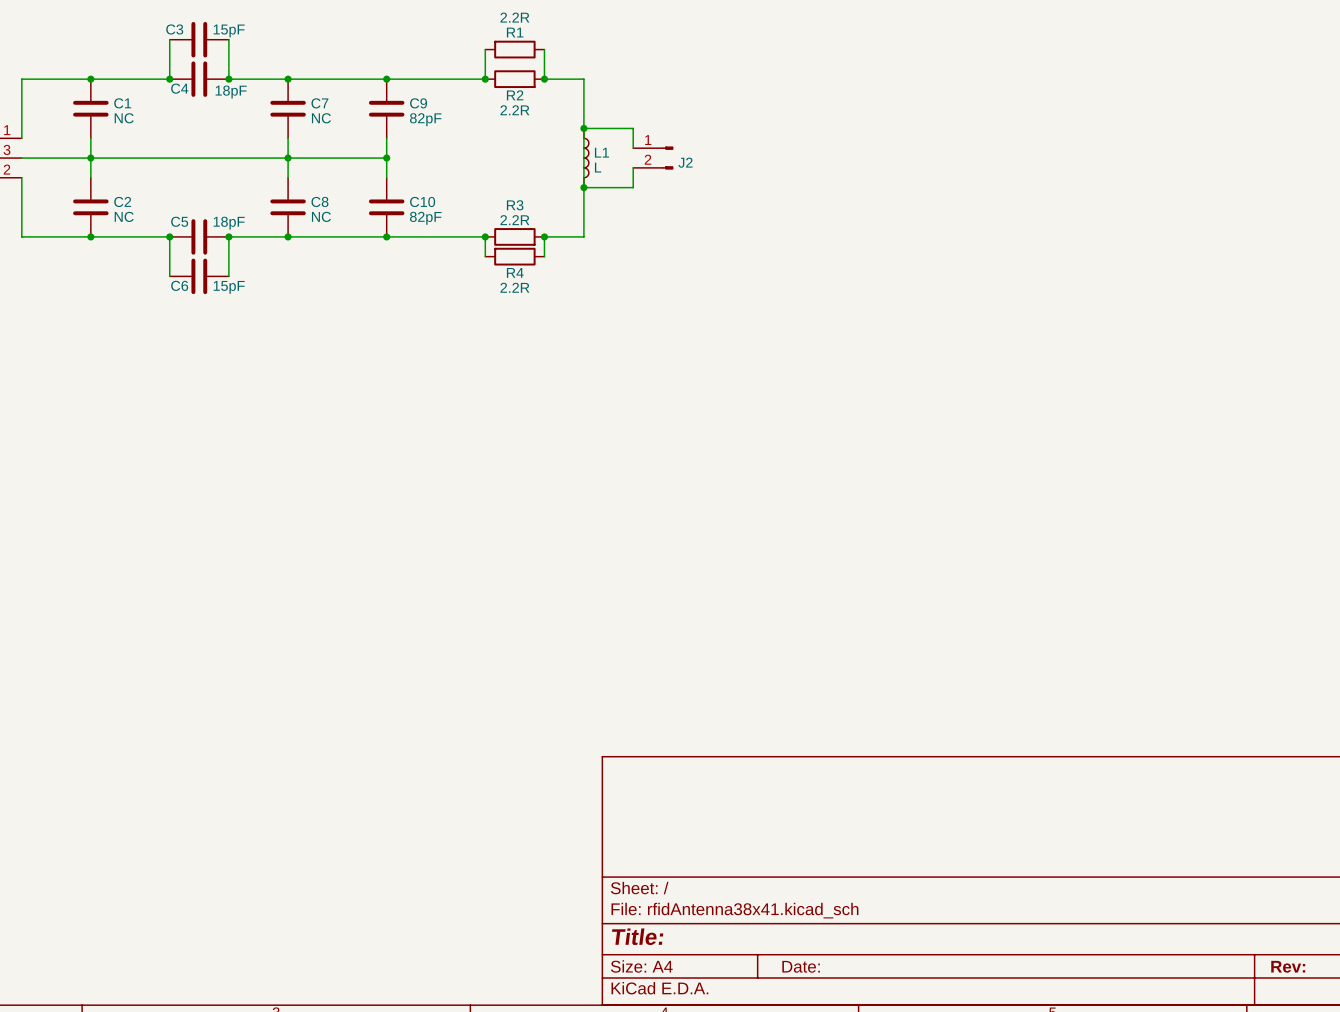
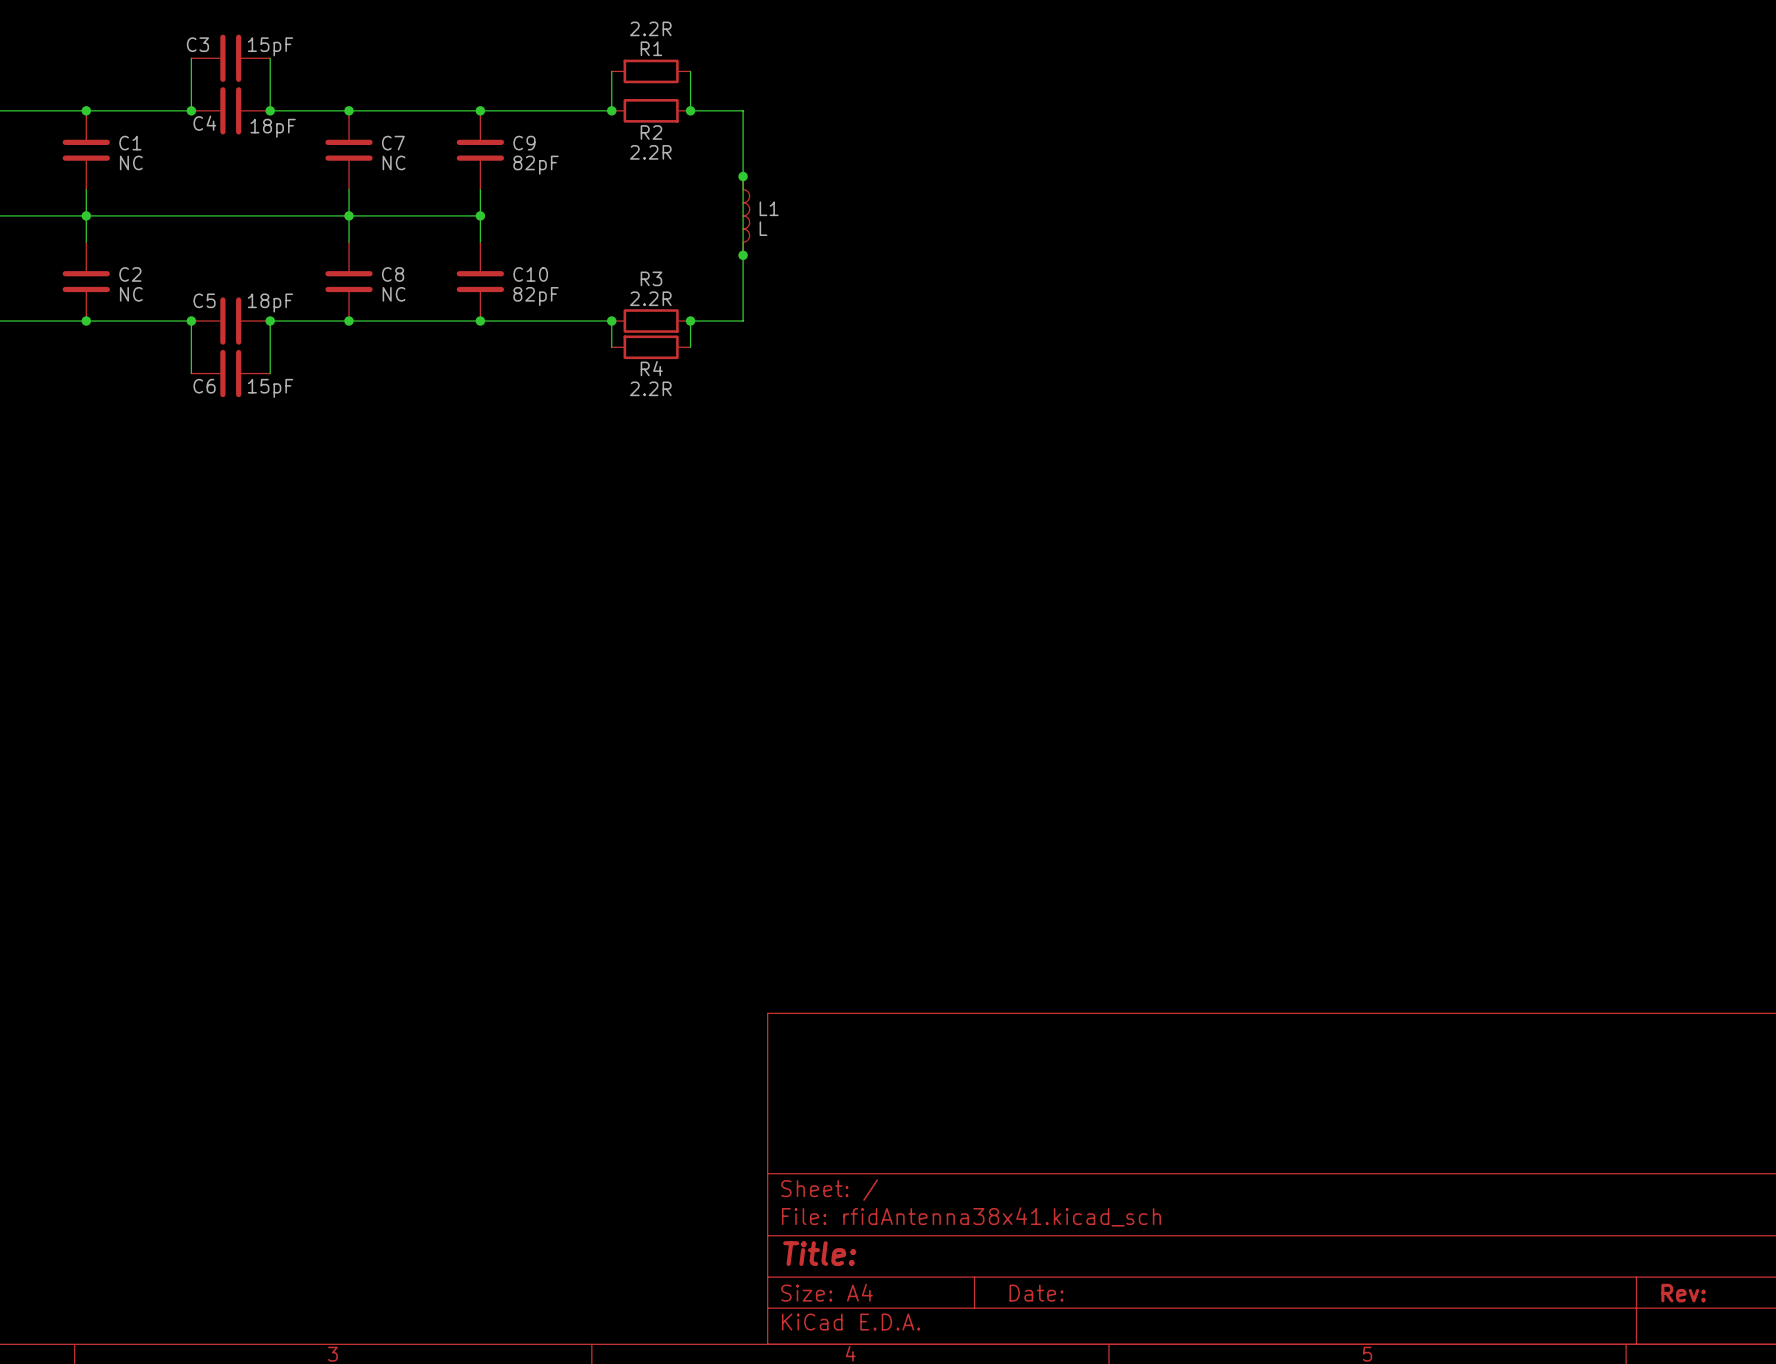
wire: (583, 128) (633, 128) (633, 148) -> none
J2: (653, 158) -> none
wire: (633, 167) (633, 187) (583, 187) -> none

